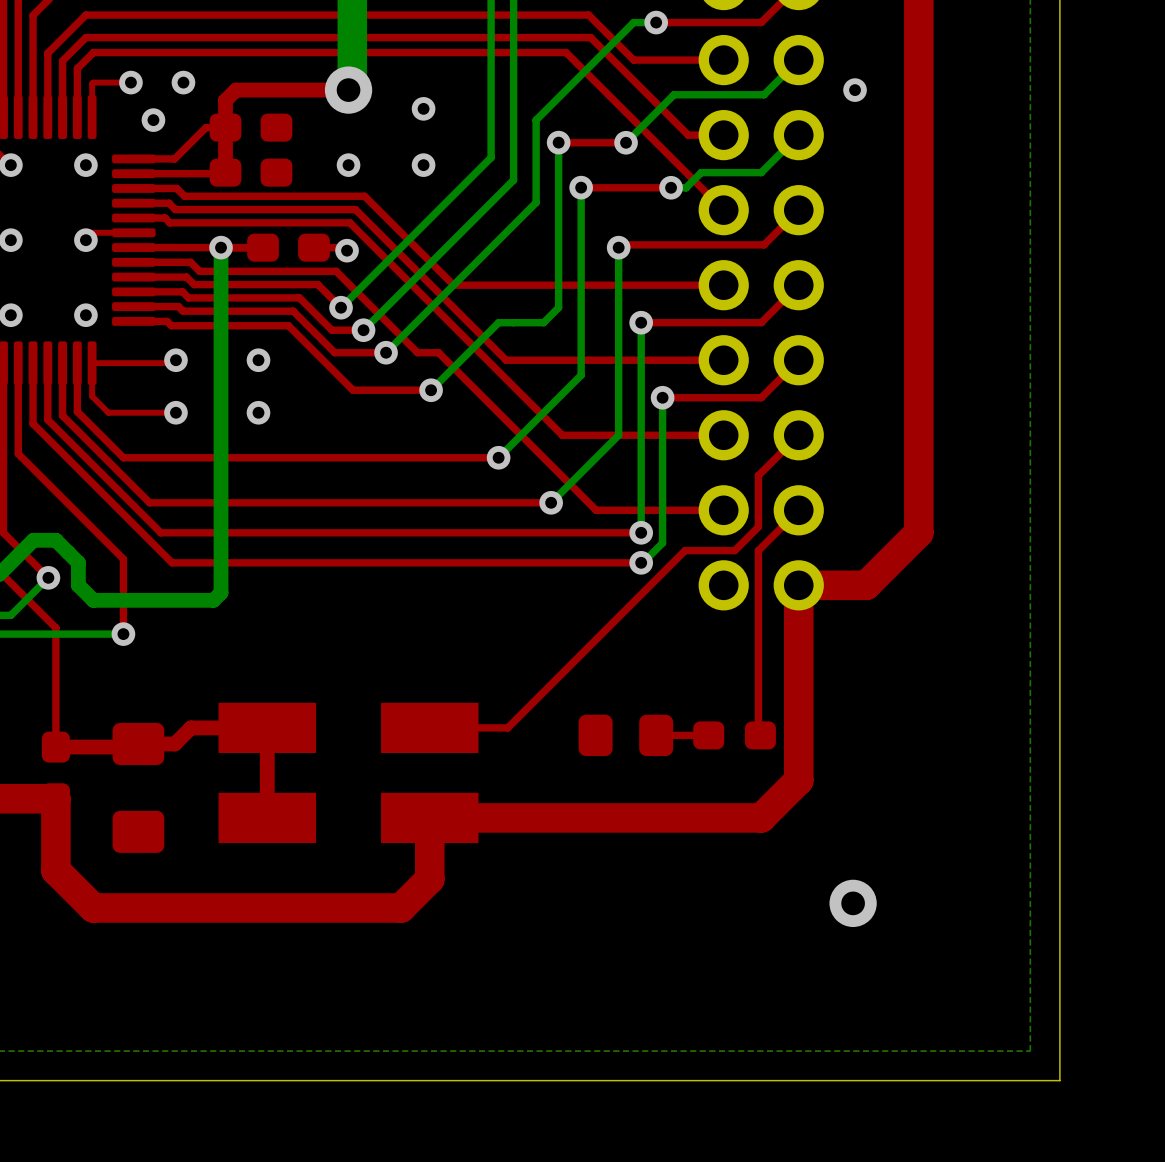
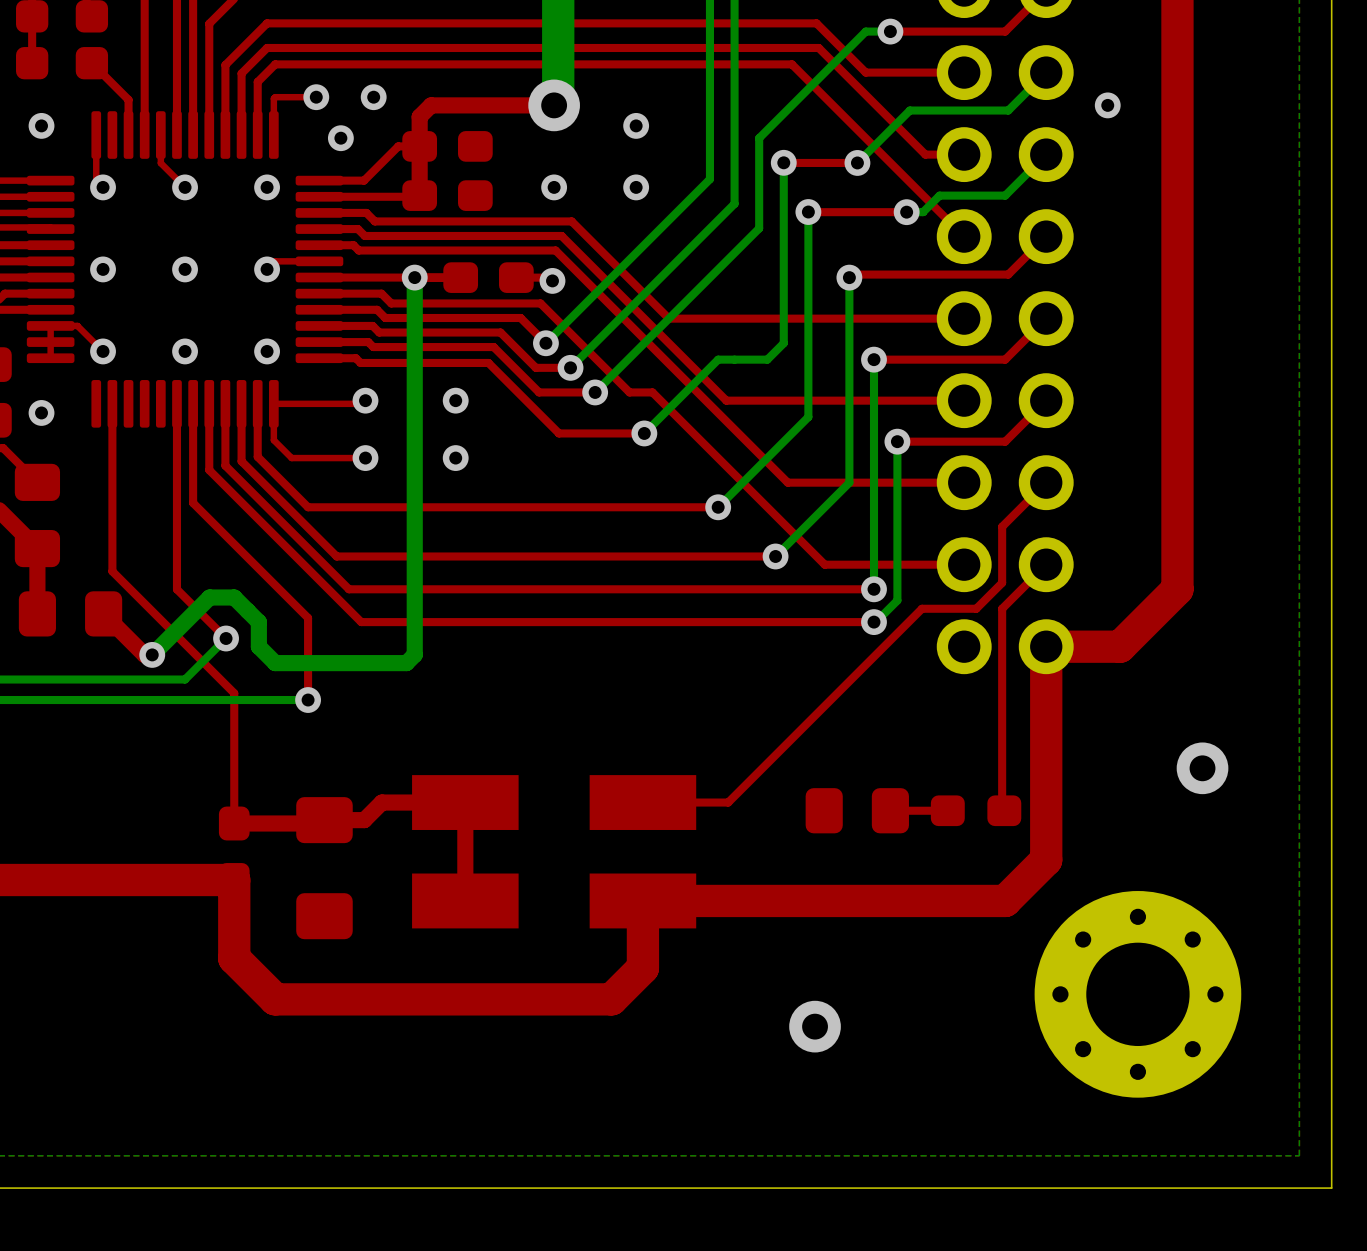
via: none -> (1202, 768)
via: (853, 903) -> none
part: none -> (1137, 994)
via: none -> (815, 1026)

